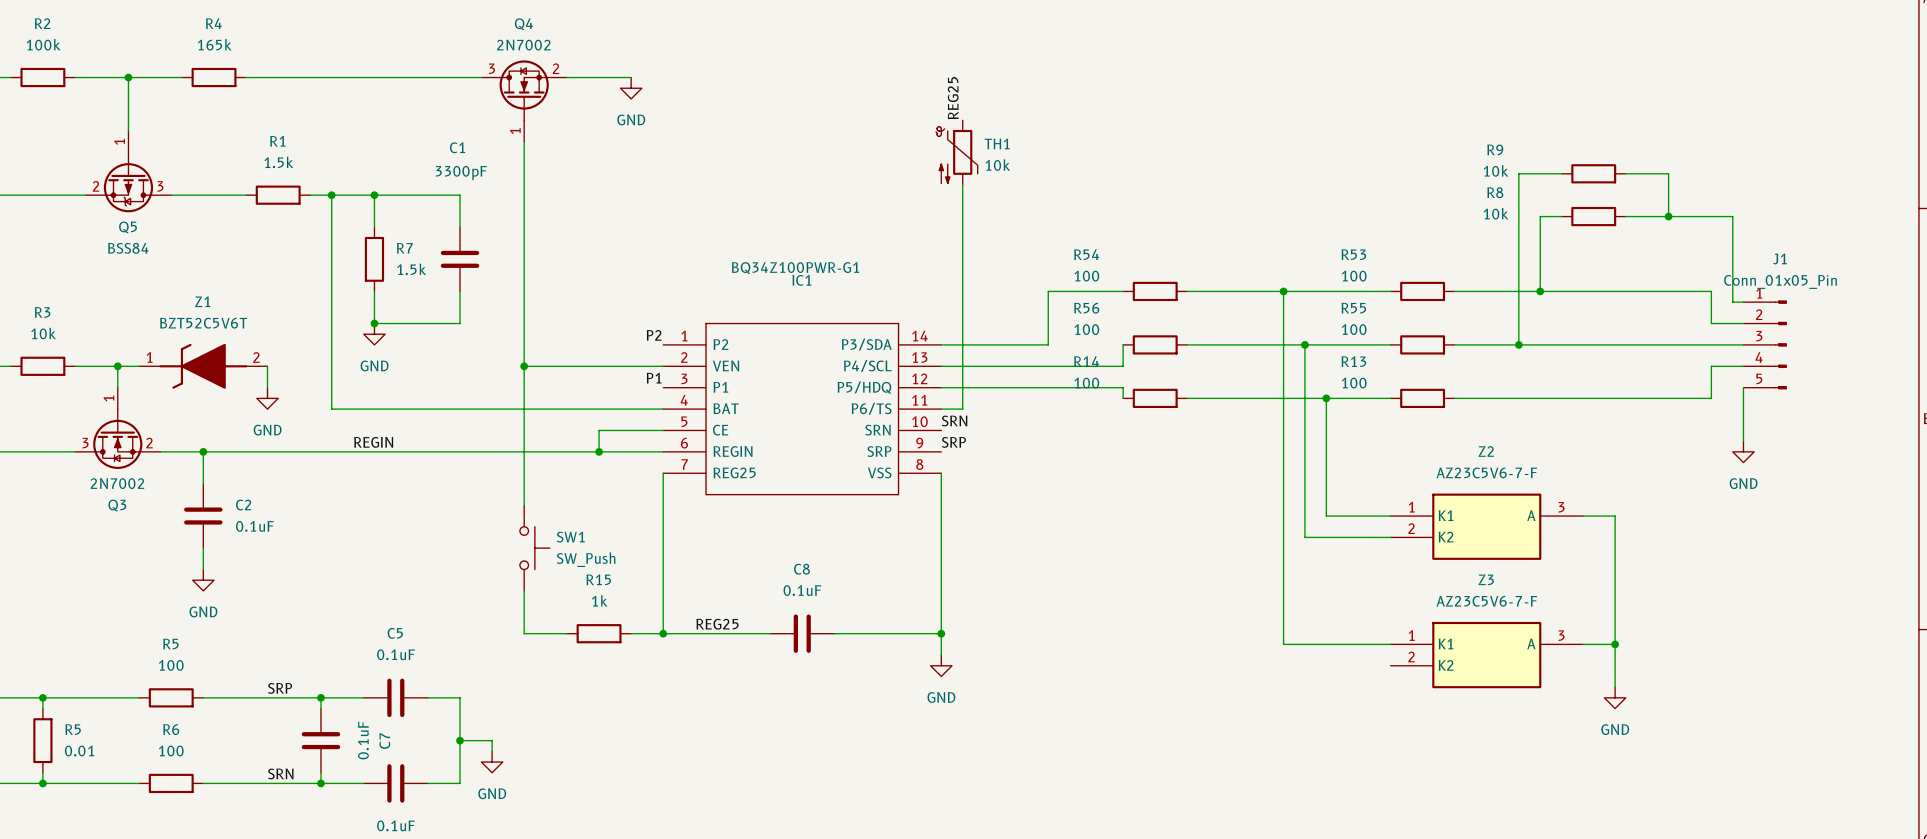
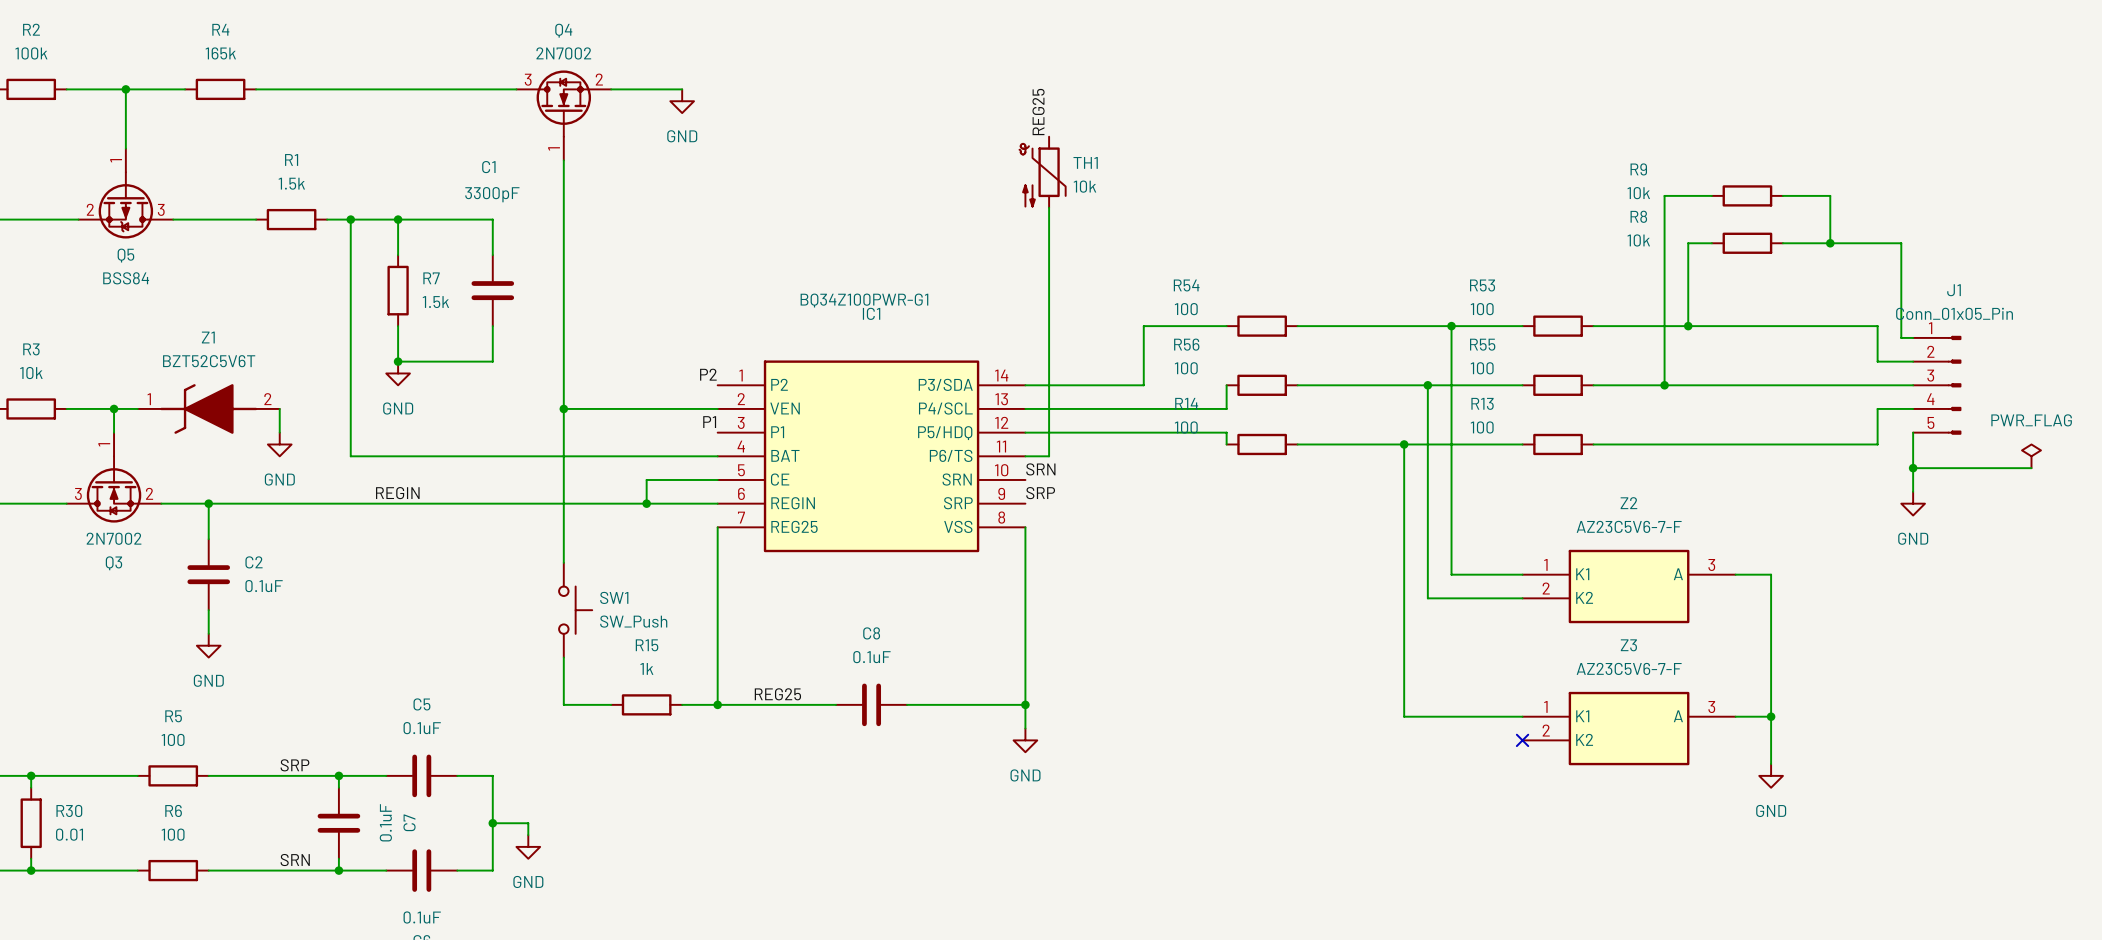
wire: (1283, 291) (1283, 398) -> (1451, 326) (1451, 444)
junction position: (1283, 291) -> (1451, 326)
IC1 symbol: [663, 322, 942, 496] -> [717, 360, 1026, 553]
junction position: (1326, 398) -> (1404, 444)
power symbol: none -> PWR_FLAG (2031, 456)
wire: none -> (1913, 468) (2031, 468)
junction: none -> (1913, 468)
no-connect mark: none -> (1522, 740)
R5 name: R5 (73, 729) -> R30 (69, 810)

